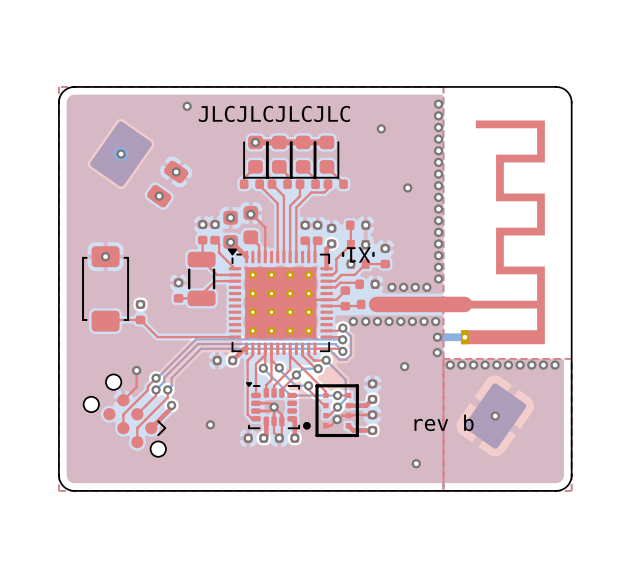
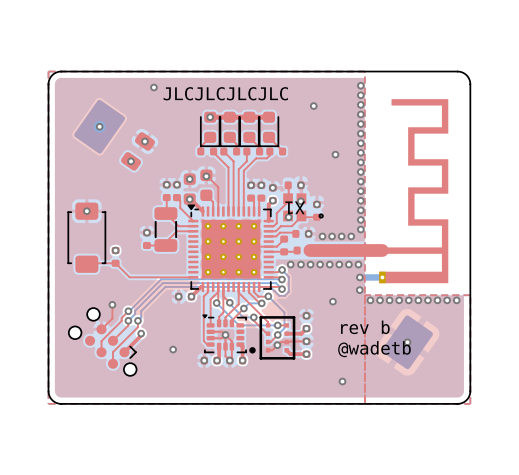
X1 footprint: [341, 239, 375, 269] -> [283, 193, 324, 222]
text: none -> rev b (365, 327)
text: rev b (444, 422) -> @wadetb (374, 349)

